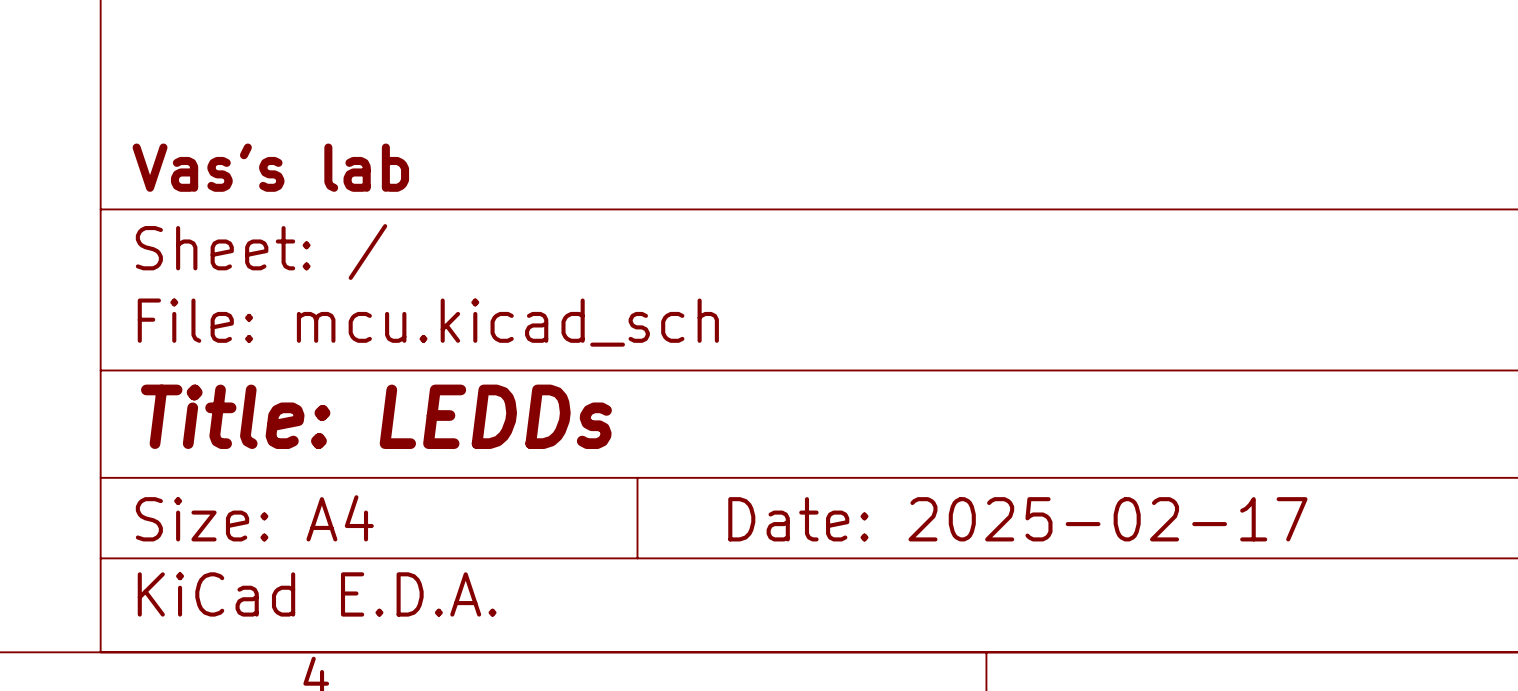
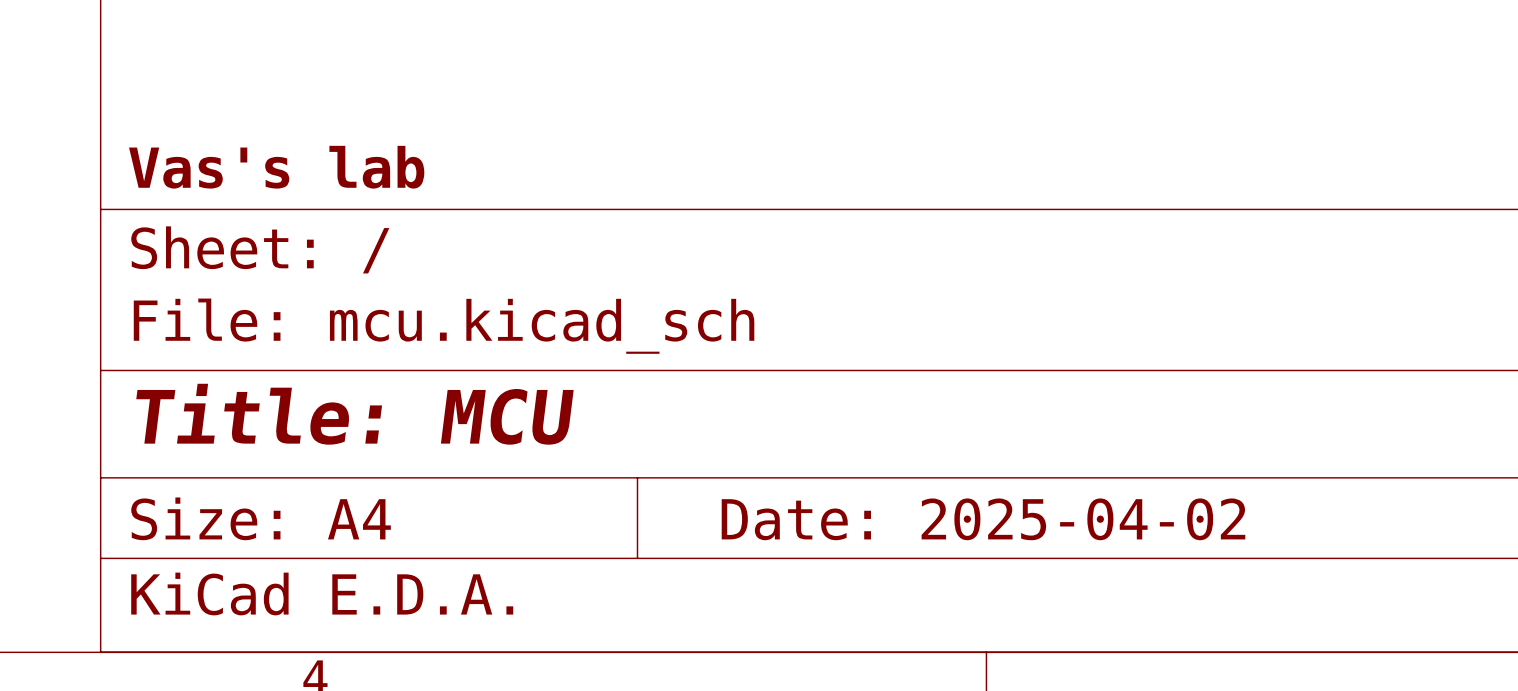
title block: Title: LEDDs (376, 416) -> Title: MCU (354, 414)
title block: Date: 2025-02-17 (1017, 519) -> Date: 2025-04-02 (983, 519)

